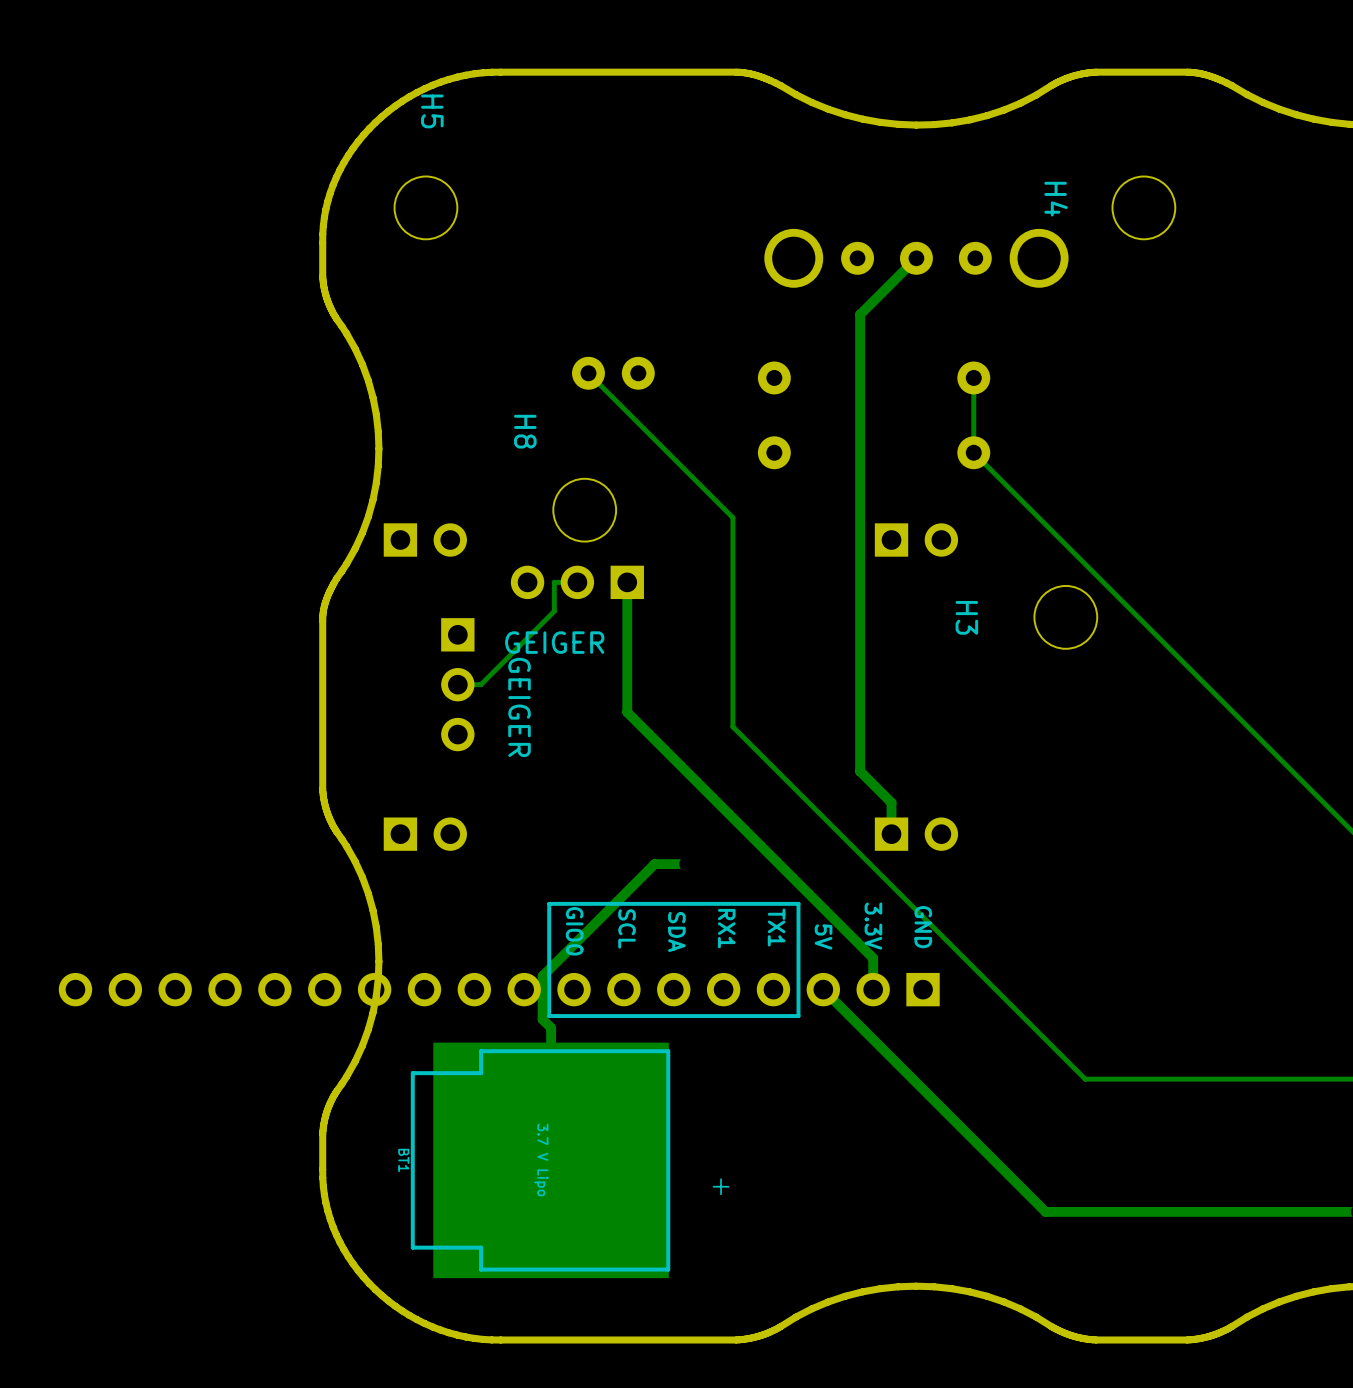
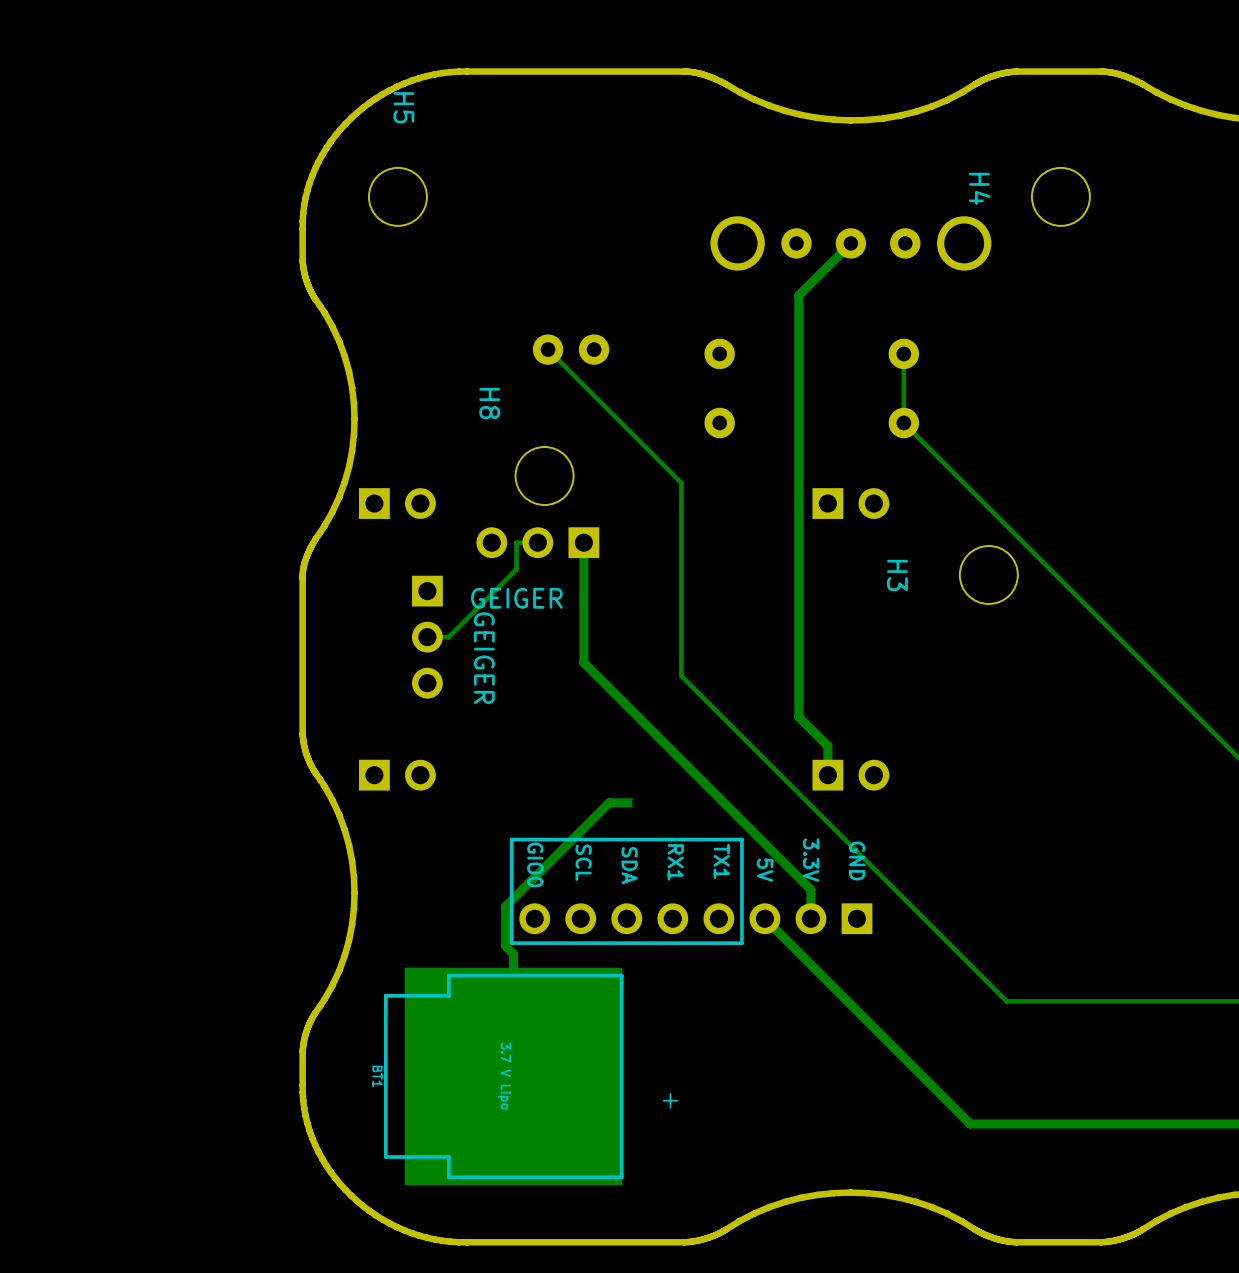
part: (499, 989) -> none

